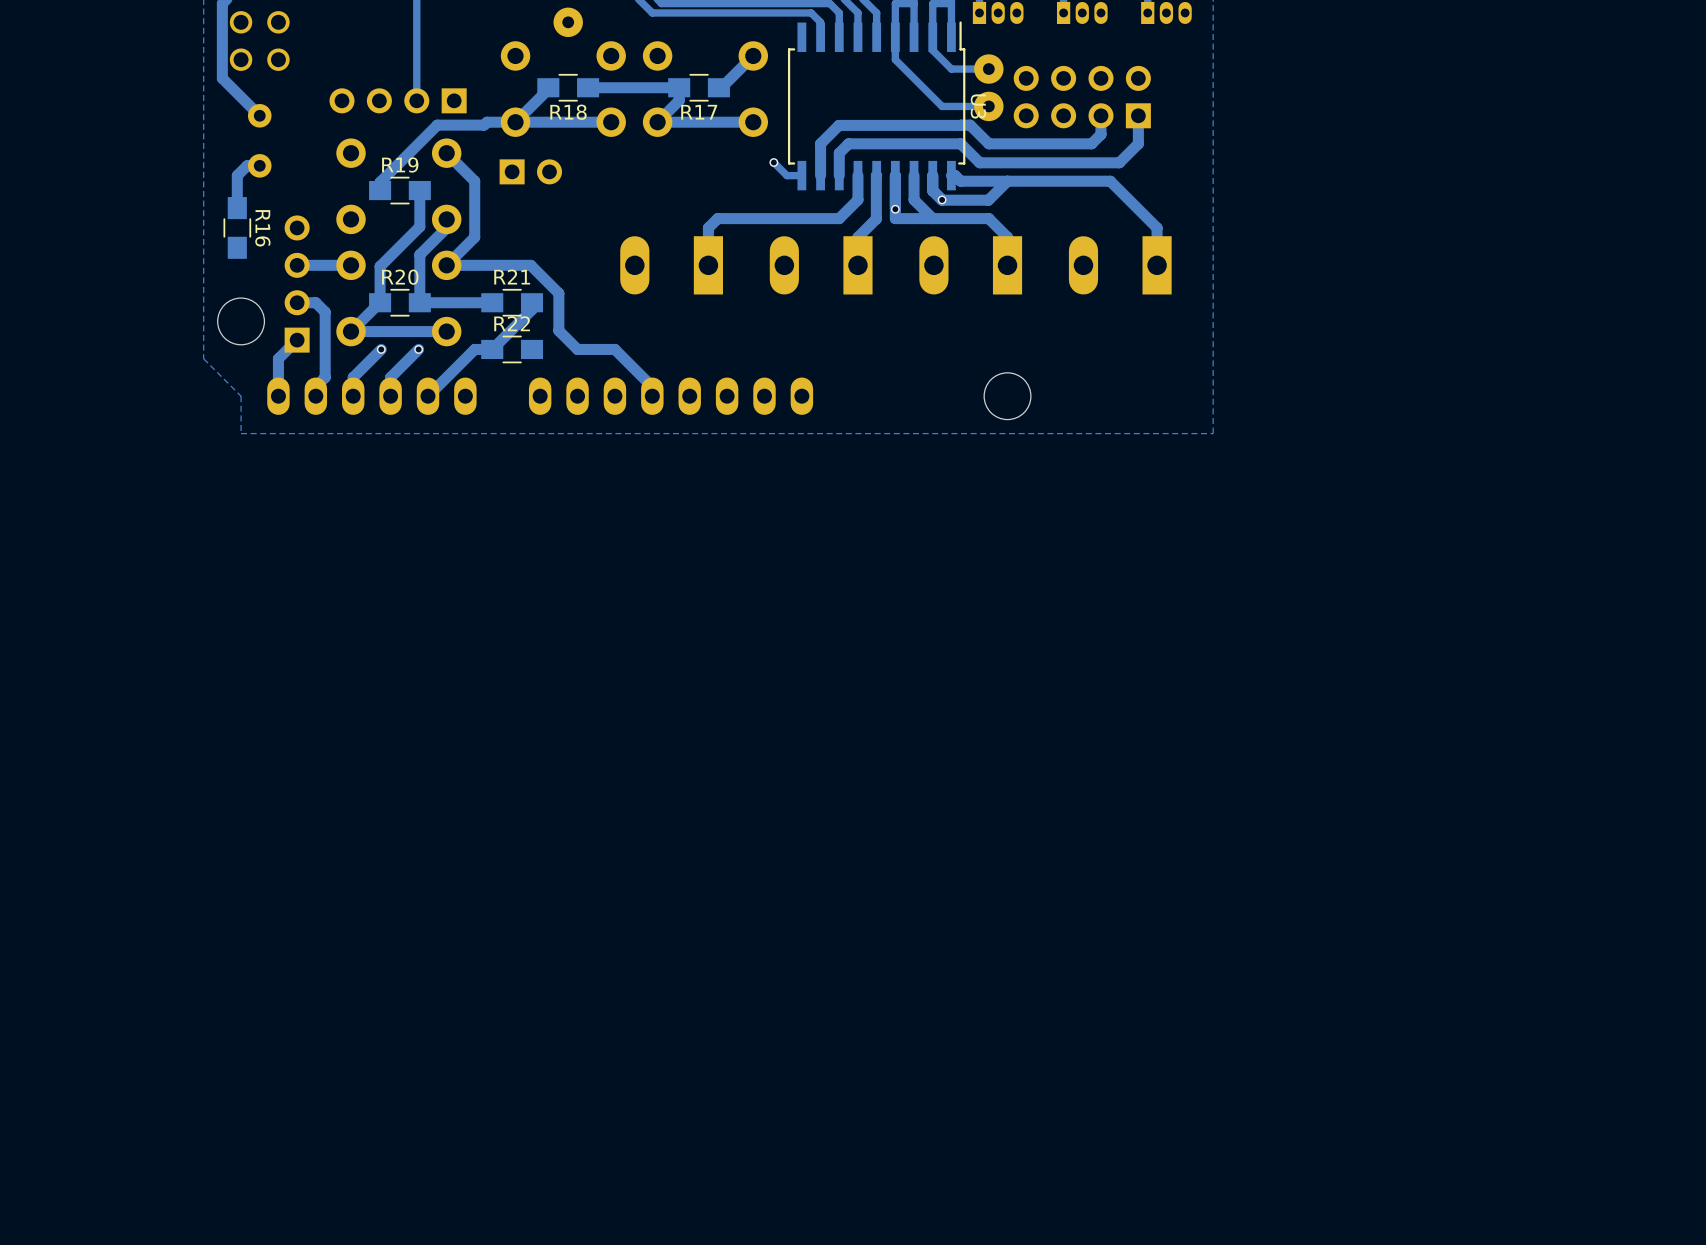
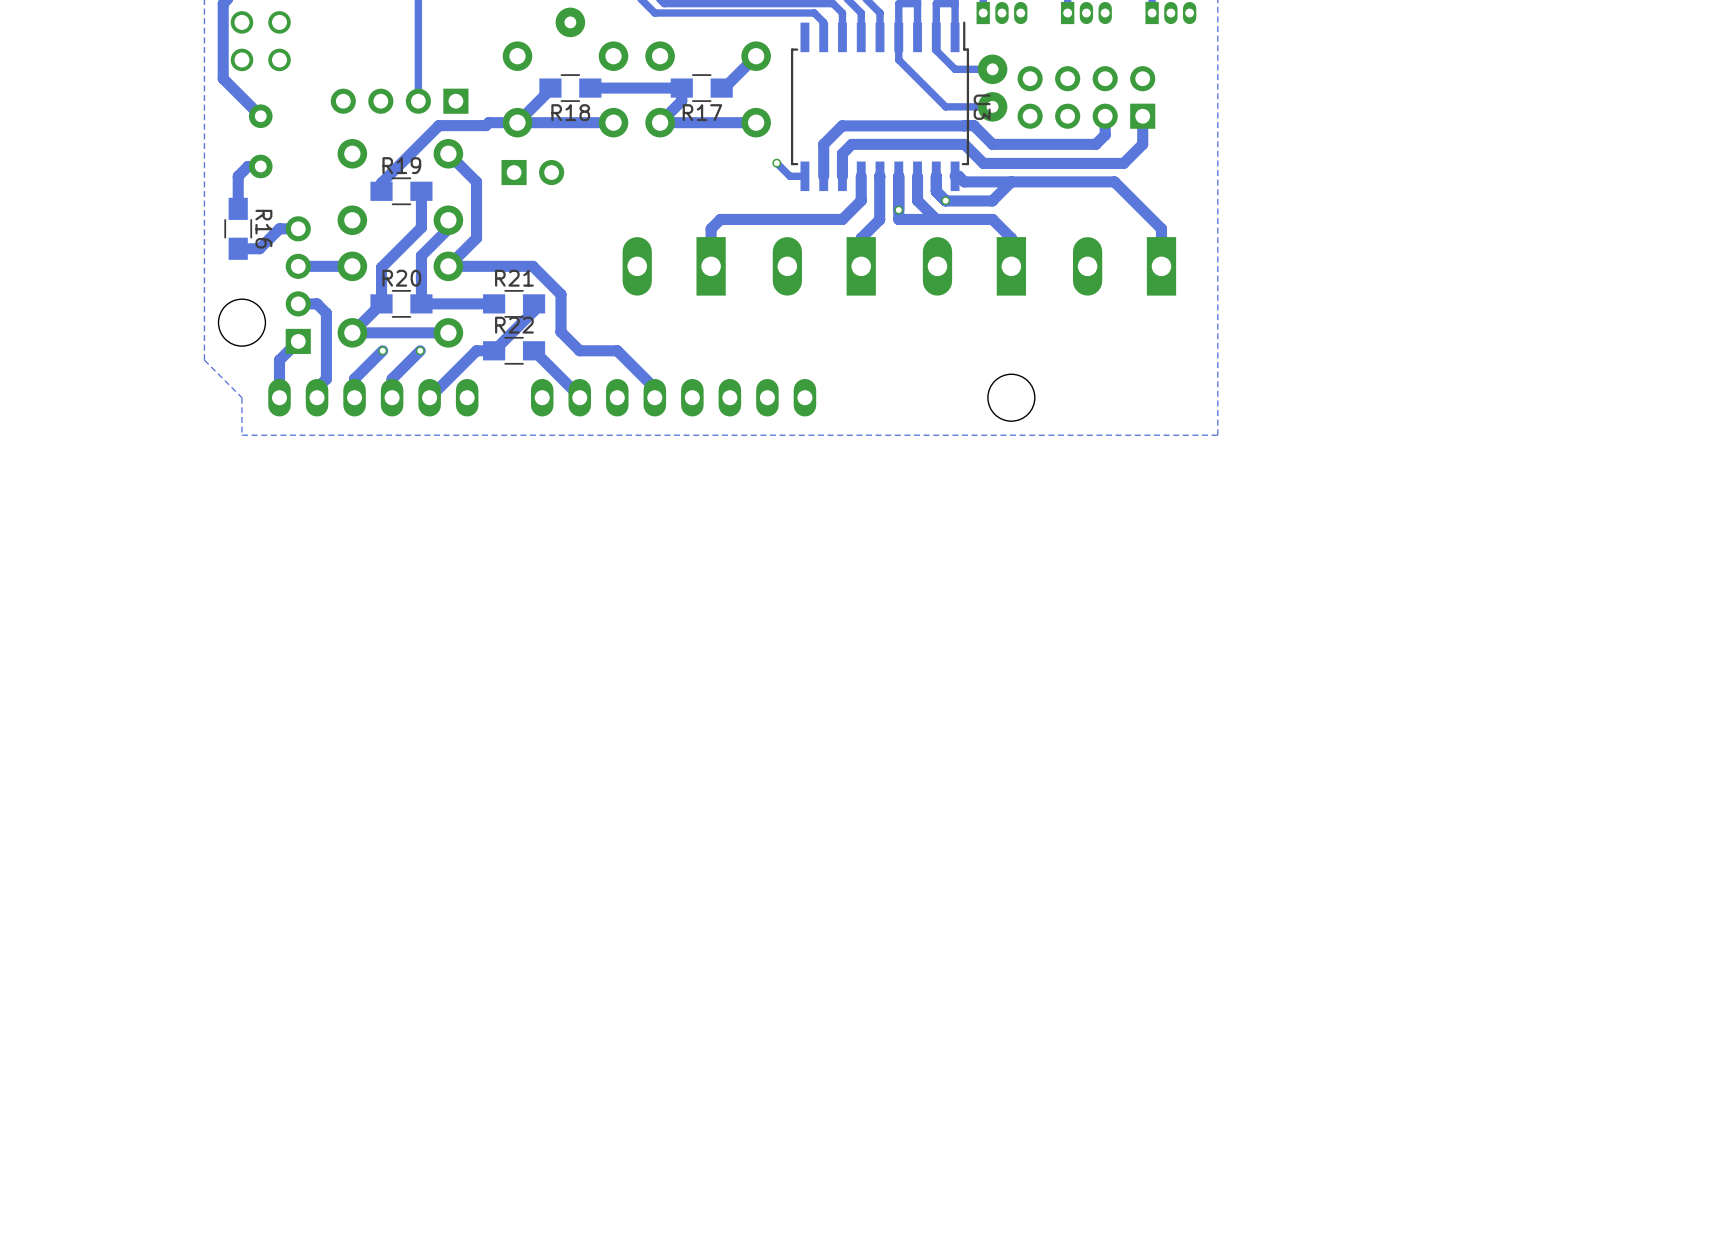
track: none -> (298, 228) (279, 228) (259, 248) (238, 248)
track: none -> (534, 350) (579, 396)

